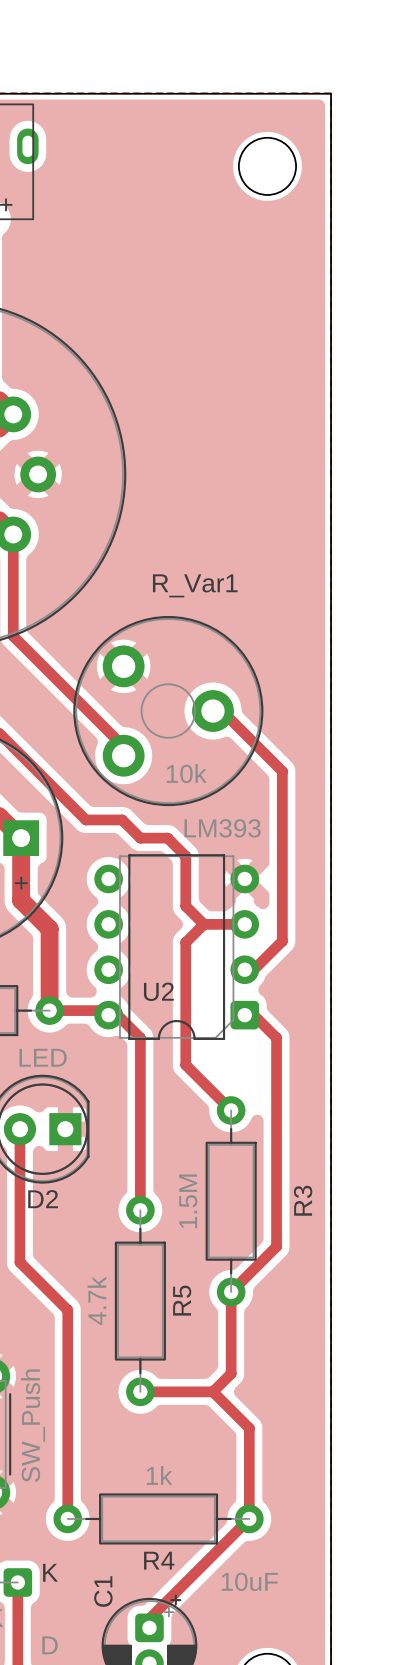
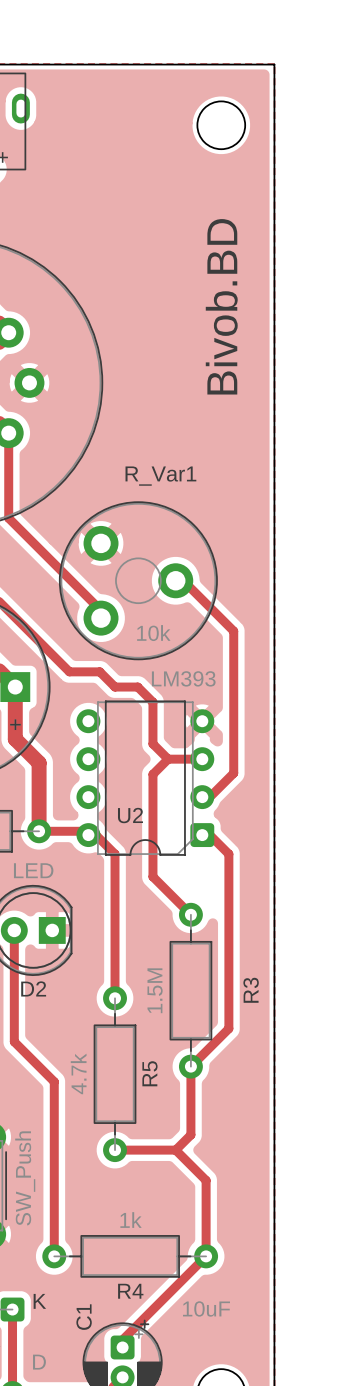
text: none -> Bivob.BD (221, 306)

